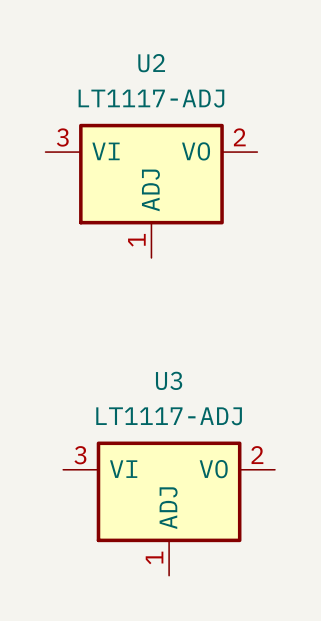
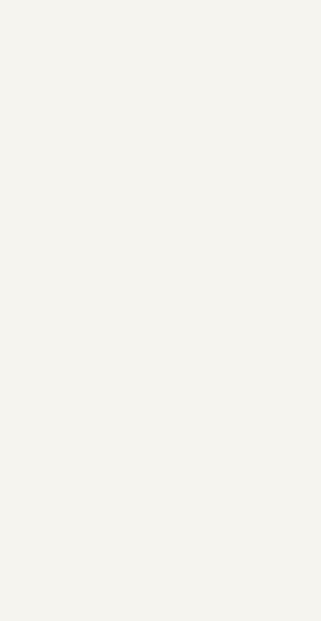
U2: LT1117-ADJ (151, 190) -> none
U3: LT1117-ADJ (169, 508) -> none

